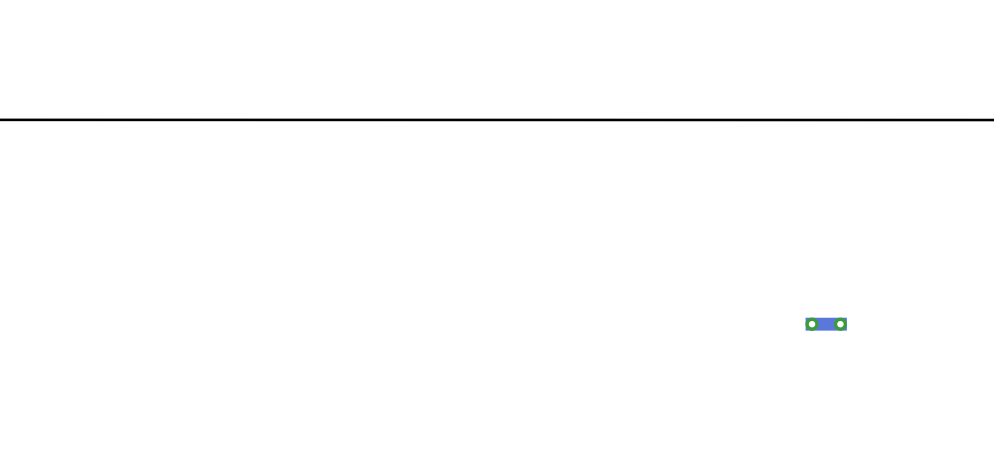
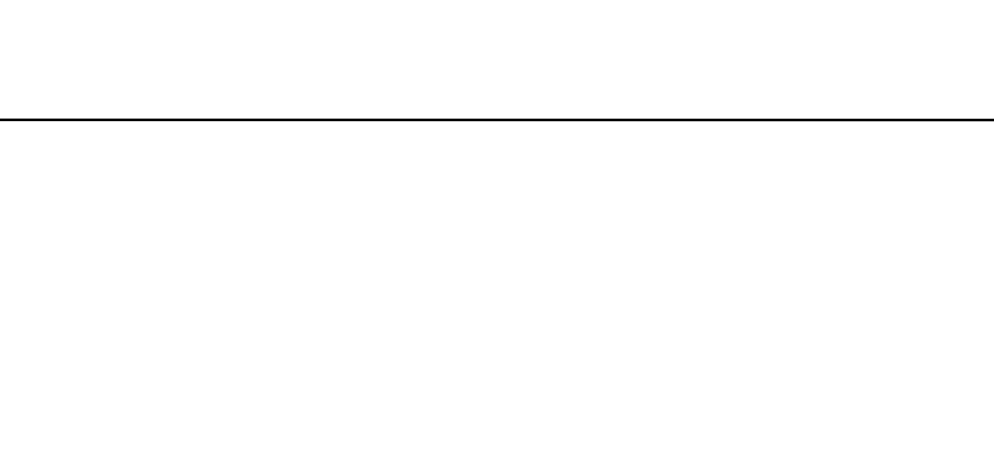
part: (826, 324) -> none

